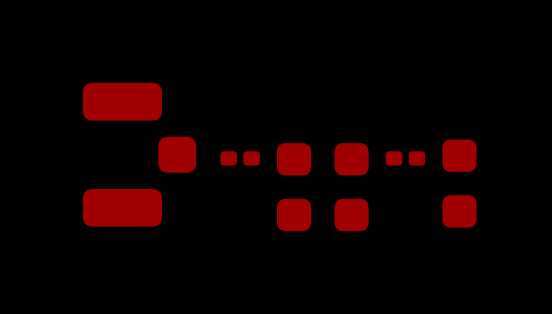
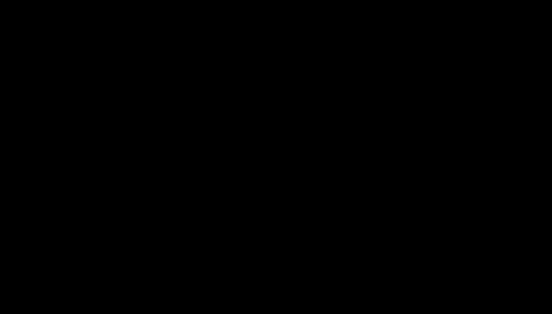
part: (139, 154) -> none
part: (240, 158) -> none
part: (405, 158) -> none
part: (459, 183) -> none
part: (294, 187) -> none
part: (351, 187) -> none

